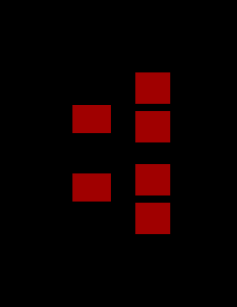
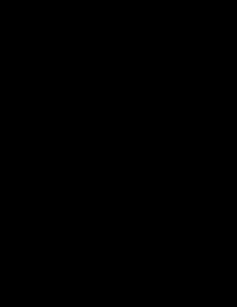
part: (152, 107) -> none
part: (91, 153) -> none
part: (152, 199) -> none

